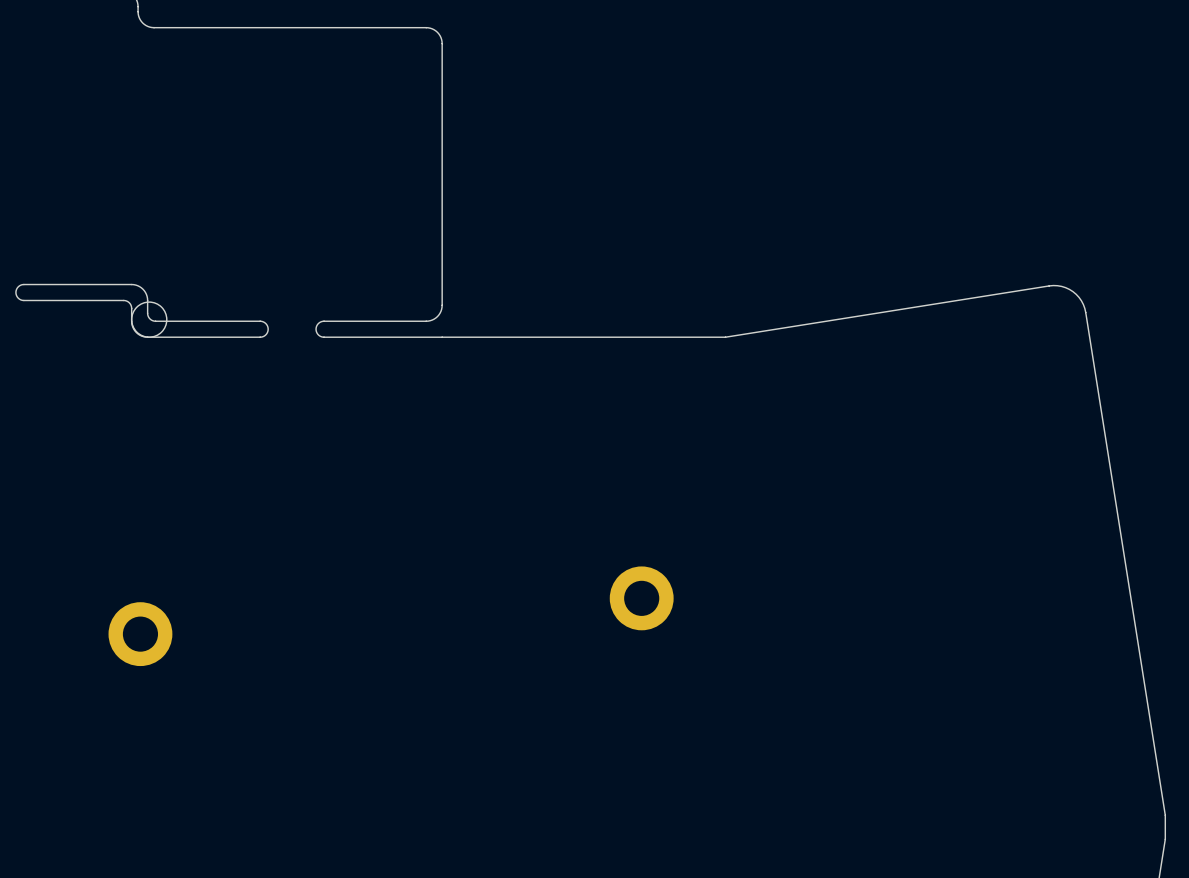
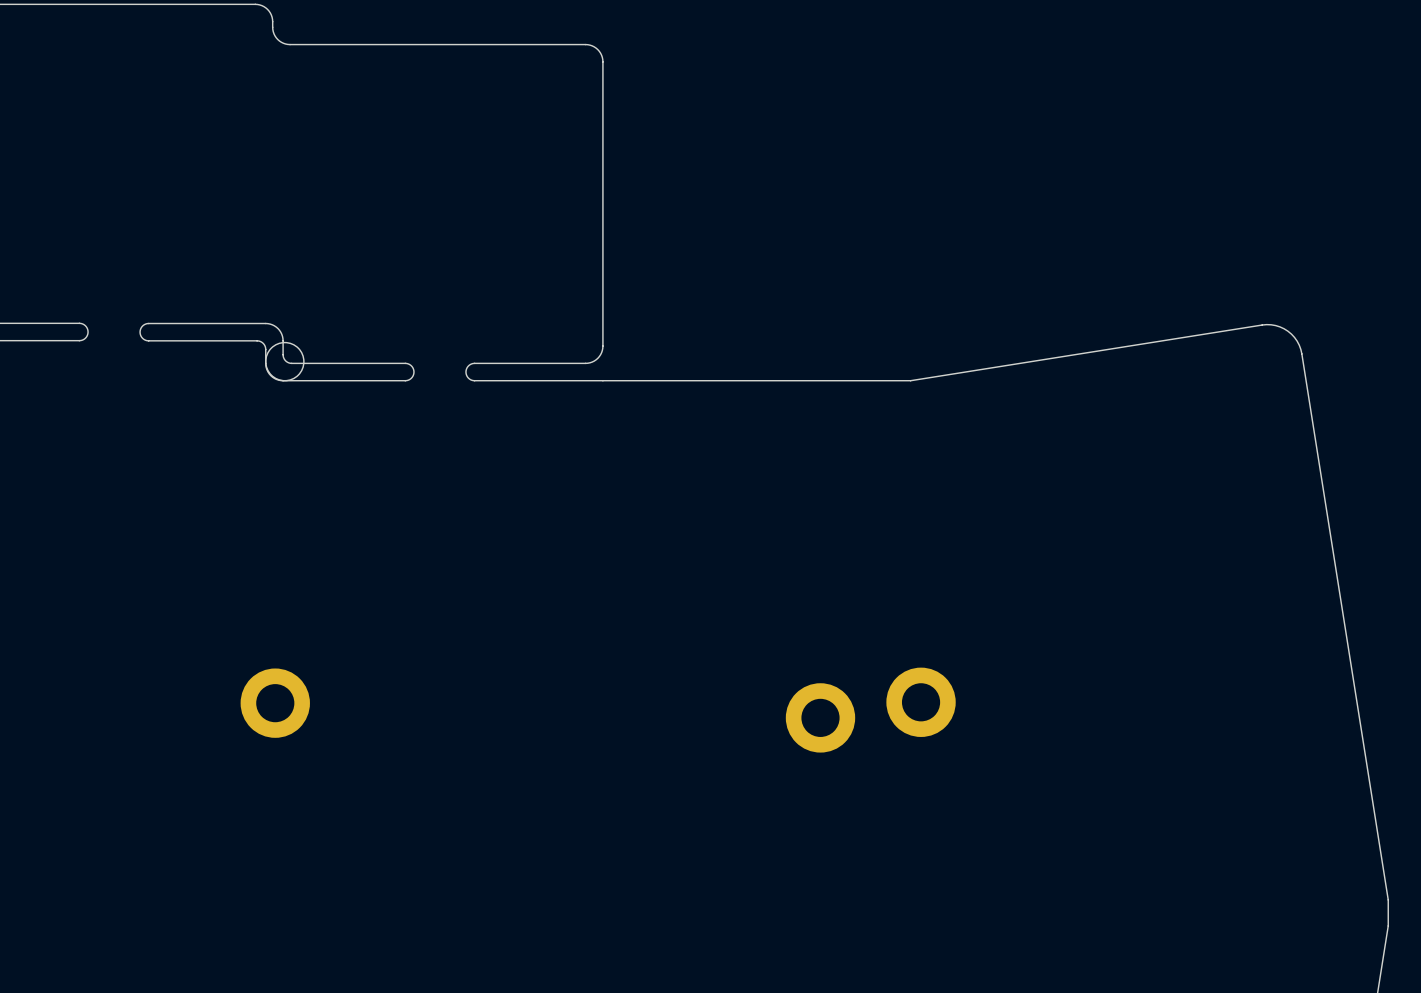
part position: (641, 598) -> (820, 717)
part: none -> (921, 702)

